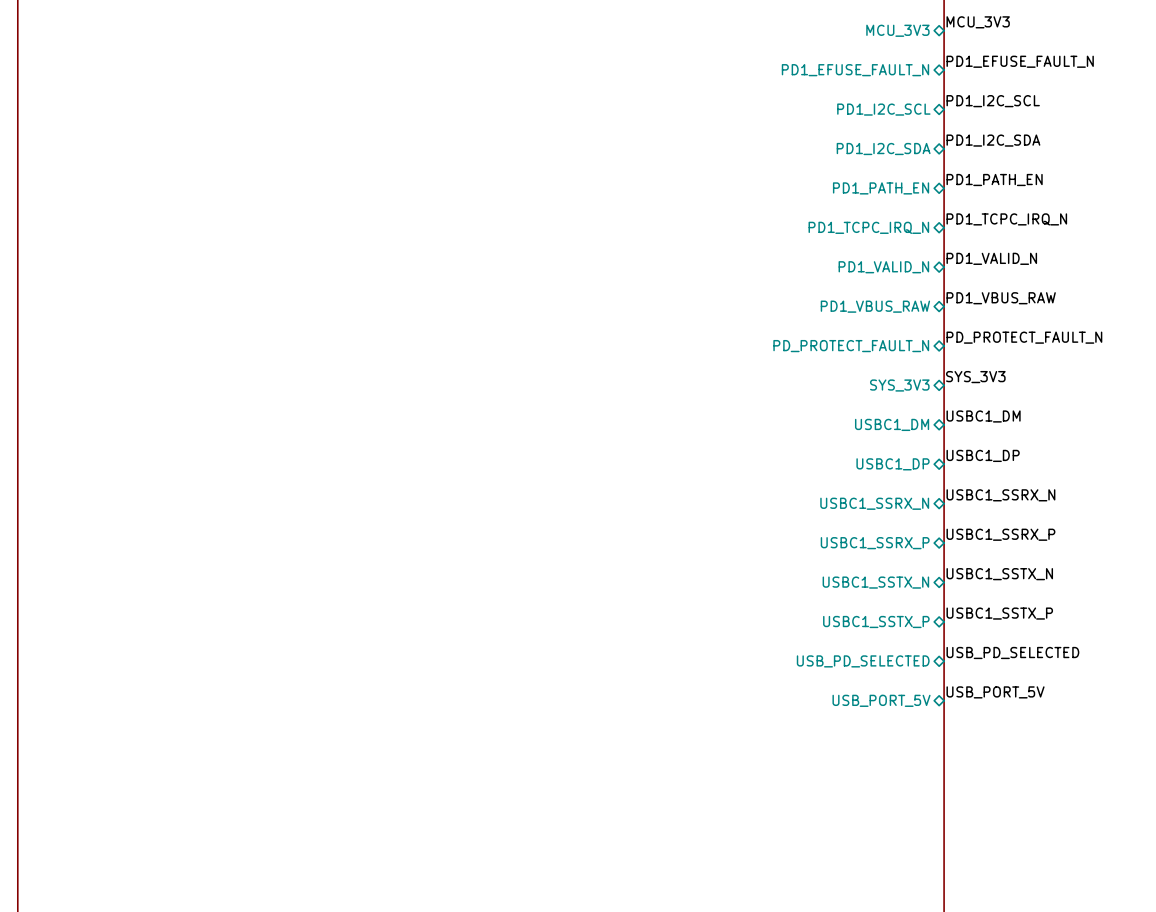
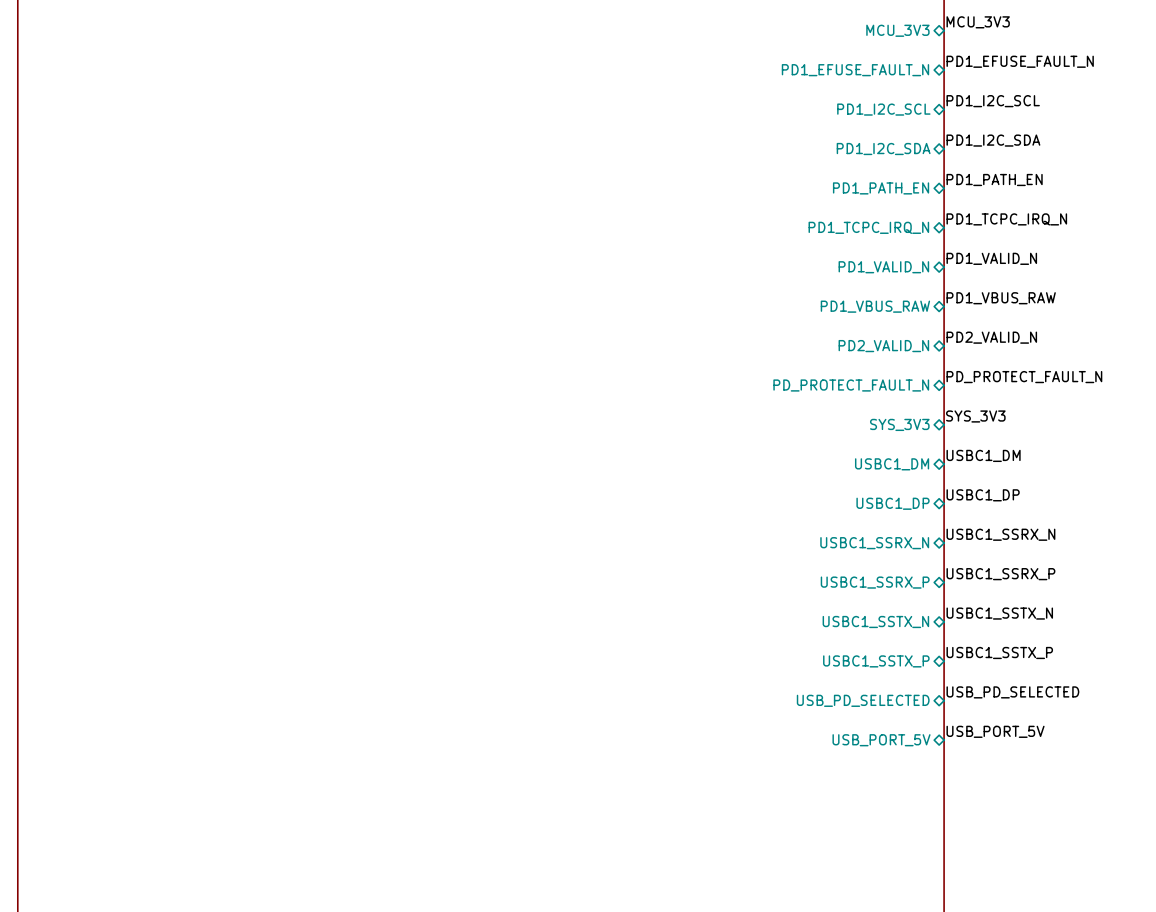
label: PD_PROTECT_FAULT_N (1024, 337) -> PD2_VALID_N (991, 337)
sheet pin: PD_PROTECT_FAULT_N (851, 346) -> PD2_VALID_N (883, 346)
label: SYS_3V3 (975, 377) -> PD_PROTECT_FAULT_N (1024, 377)
sheet pin: SYS_3V3 (899, 385) -> PD_PROTECT_FAULT_N (851, 385)
label: USBC1_DM (983, 416) -> SYS_3V3 (975, 416)
sheet pin: USBC1_DM (892, 424) -> SYS_3V3 (899, 424)
label: USBC1_DP (983, 455) -> USBC1_DM (983, 455)
sheet pin: USBC1_DP (893, 464) -> USBC1_DM (892, 464)
label: USBC1_SSRX_N (1000, 495) -> USBC1_DP (983, 495)
sheet pin: USBC1_SSRX_N (874, 503) -> USBC1_DP (893, 503)
label: USBC1_SSRX_P (1000, 534) -> USBC1_SSRX_N (1000, 534)
sheet pin: USBC1_SSRX_P (875, 543) -> USBC1_SSRX_N (874, 543)
label: USBC1_SSTX_N (999, 574) -> USBC1_SSRX_P (1000, 574)
sheet pin: USBC1_SSTX_N (875, 582) -> USBC1_SSRX_P (875, 582)
label: USBC1_SSTX_P (999, 613) -> USBC1_SSTX_N (999, 613)
sheet pin: USBC1_SSTX_P (876, 621) -> USBC1_SSTX_N (875, 621)
label: USB_PD_SELECTED (1012, 652) -> USBC1_SSTX_P (999, 652)
sheet pin: USB_PD_SELECTED (863, 661) -> USBC1_SSTX_P (876, 661)
label: USB_PORT_5V (995, 692) -> USB_PD_SELECTED (1012, 692)
sheet pin: USB_PORT_5V (881, 700) -> USB_PD_SELECTED (863, 700)
label: none -> USB_PORT_5V (995, 731)
sheet pin: none -> USB_PORT_5V (881, 740)

